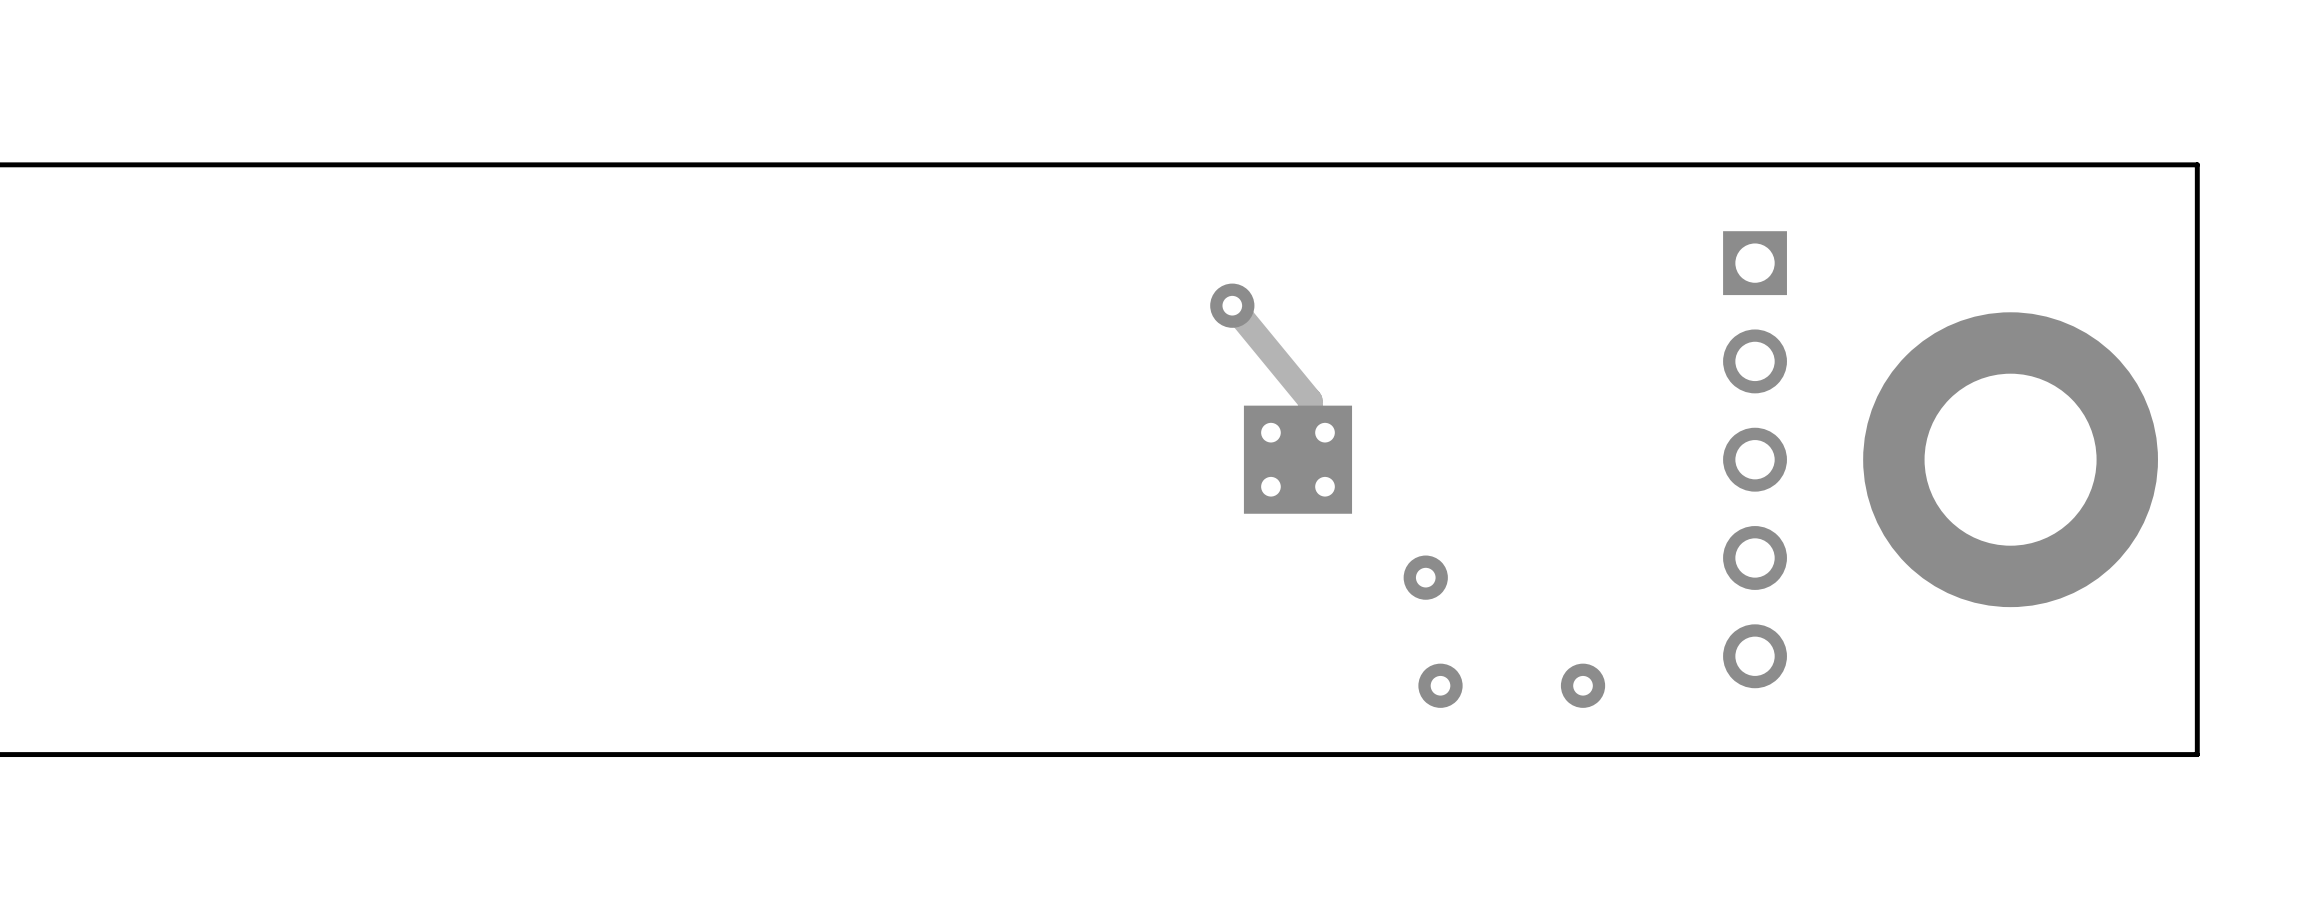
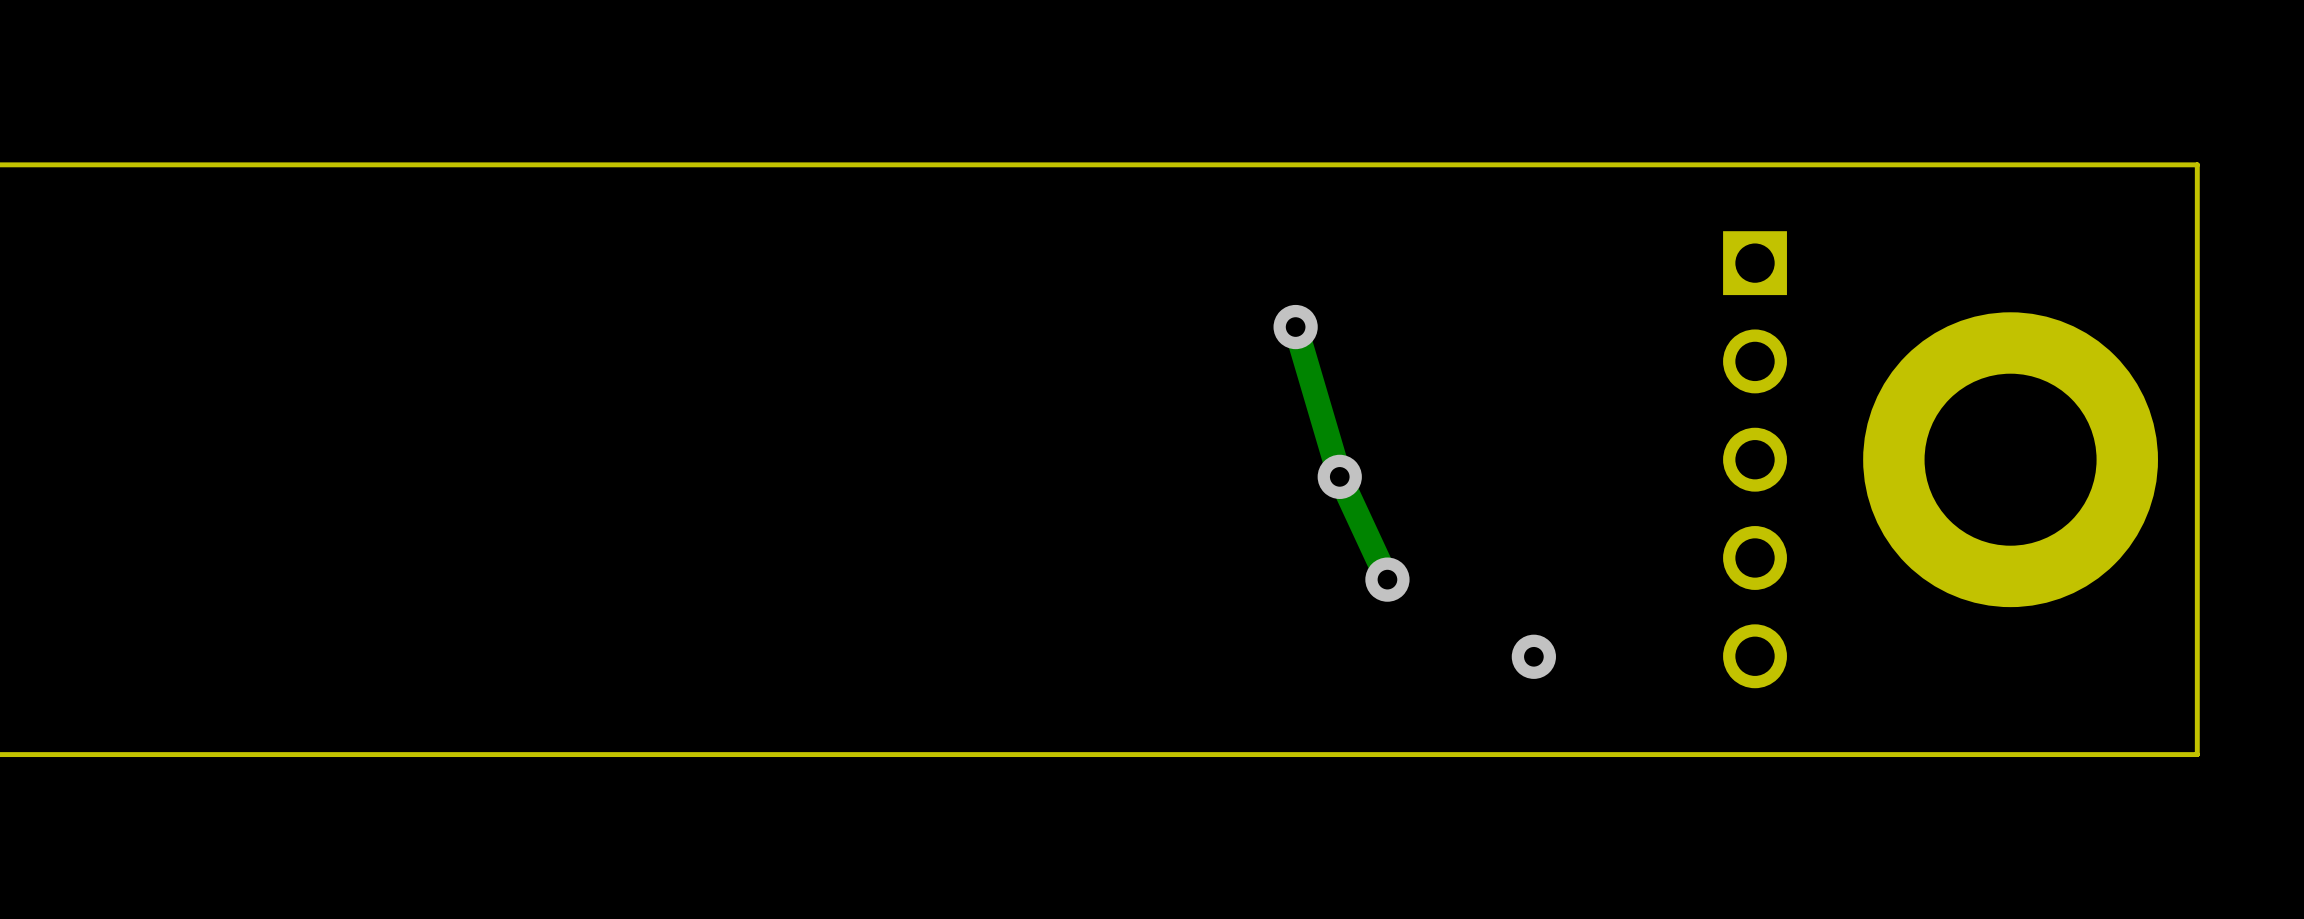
track: (1232, 305) (1310, 400) (1310, 417) (1325, 432) -> none
via position: (1232, 305) -> (1295, 327)
track: none -> (1295, 327) (1339, 476) (1387, 579)
part: (1297, 459) -> none
via: none -> (1339, 476)
via position: (1425, 577) -> (1387, 579)
via: none -> (1533, 656)
via: (1440, 685) -> none
via: (1583, 685) -> none

